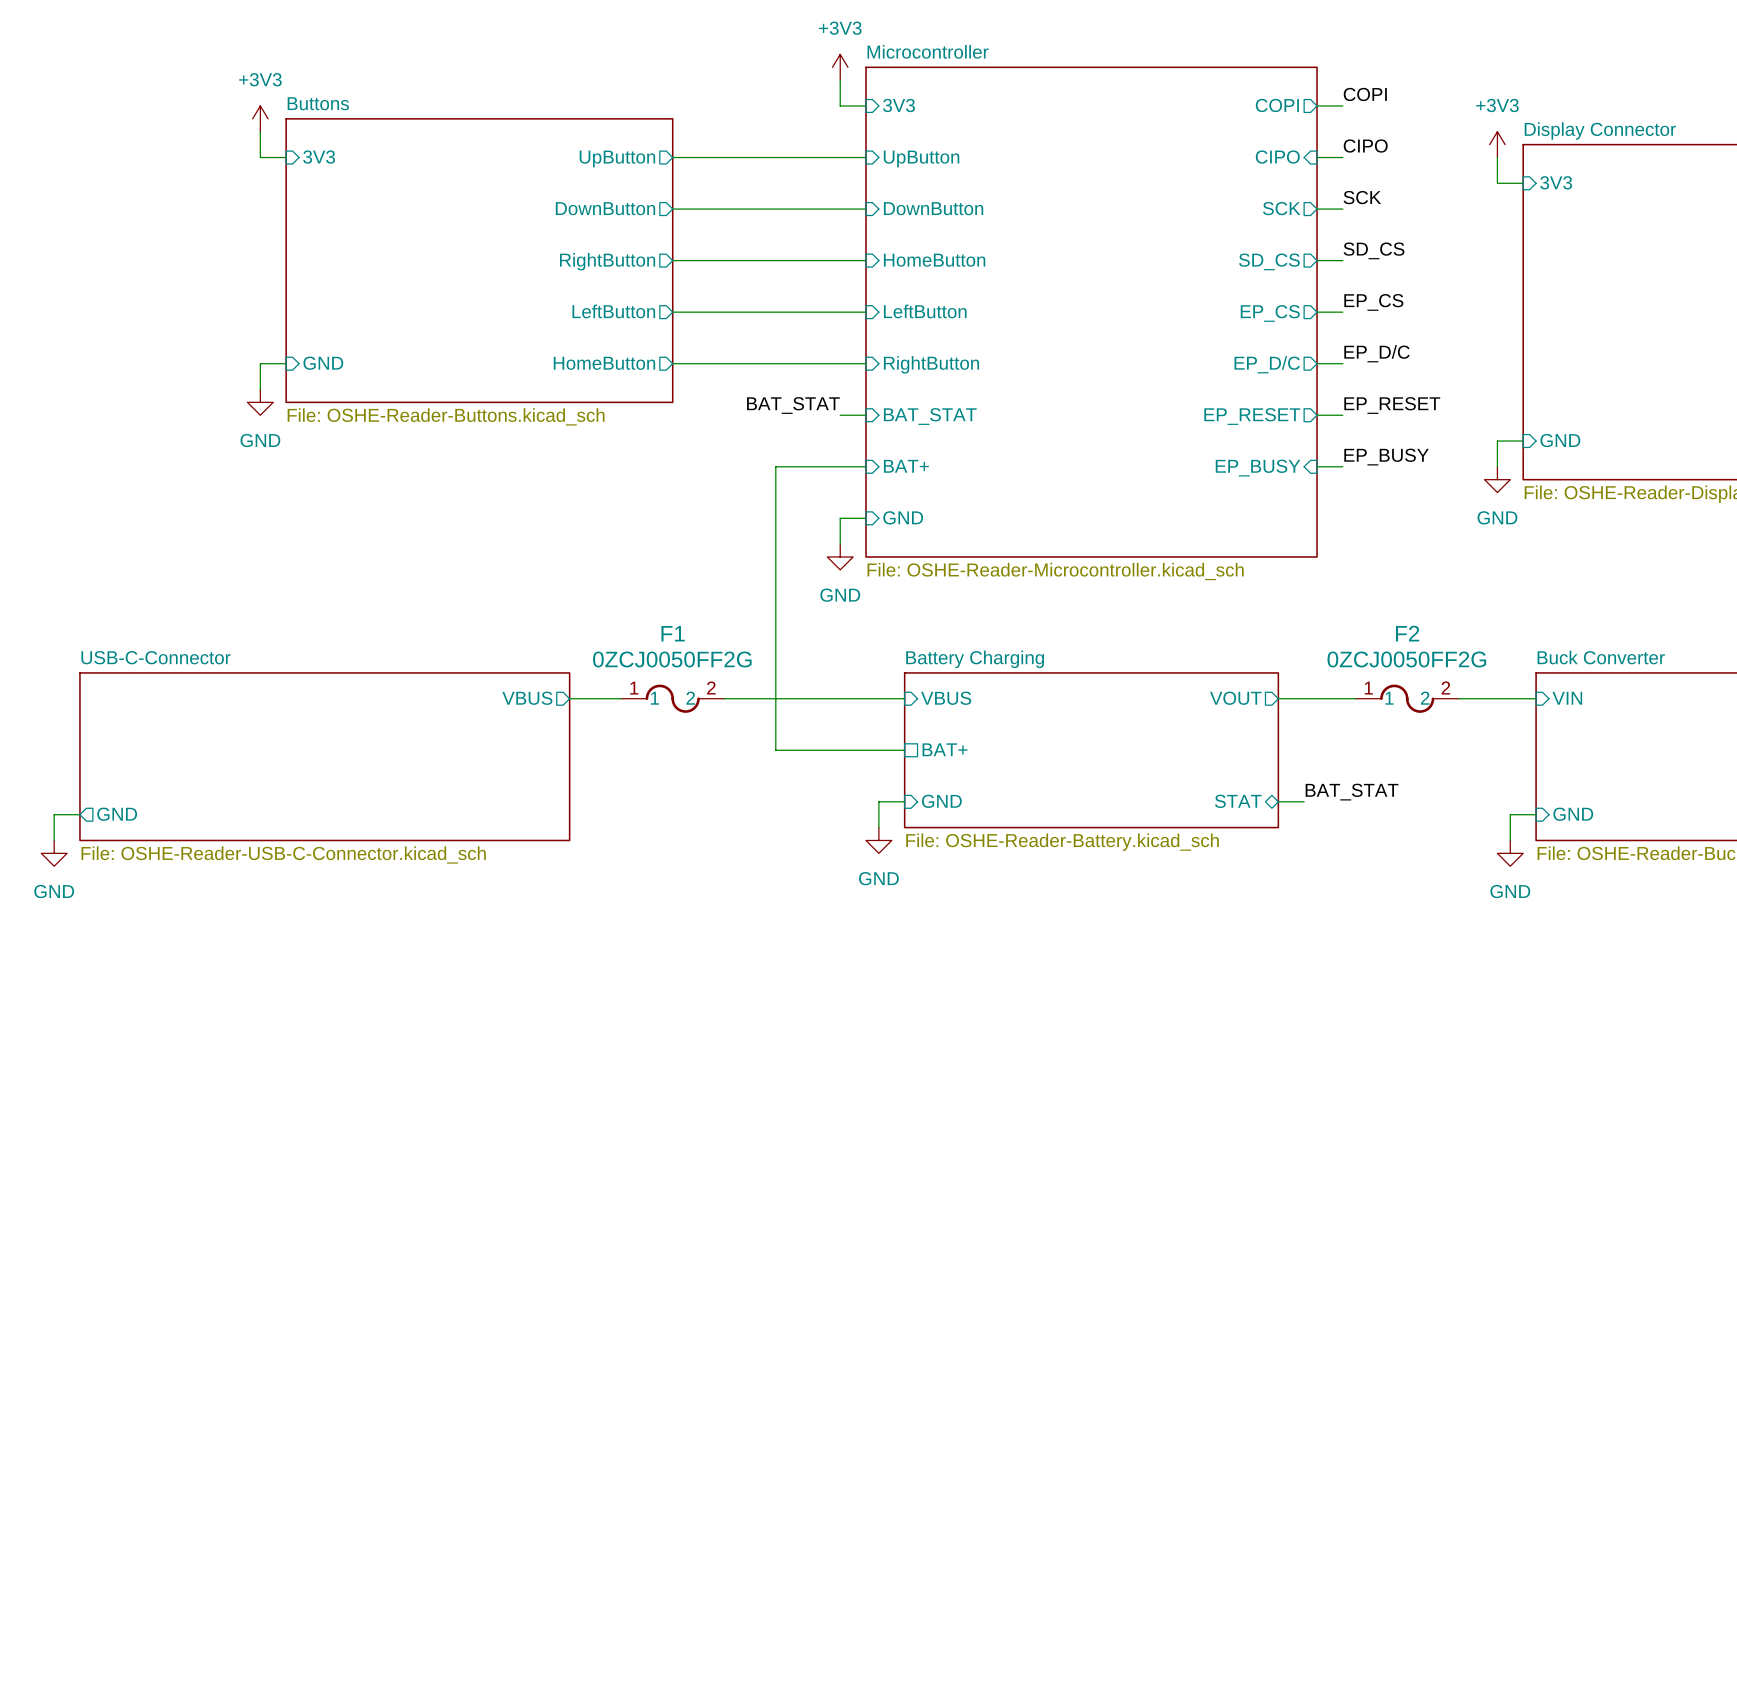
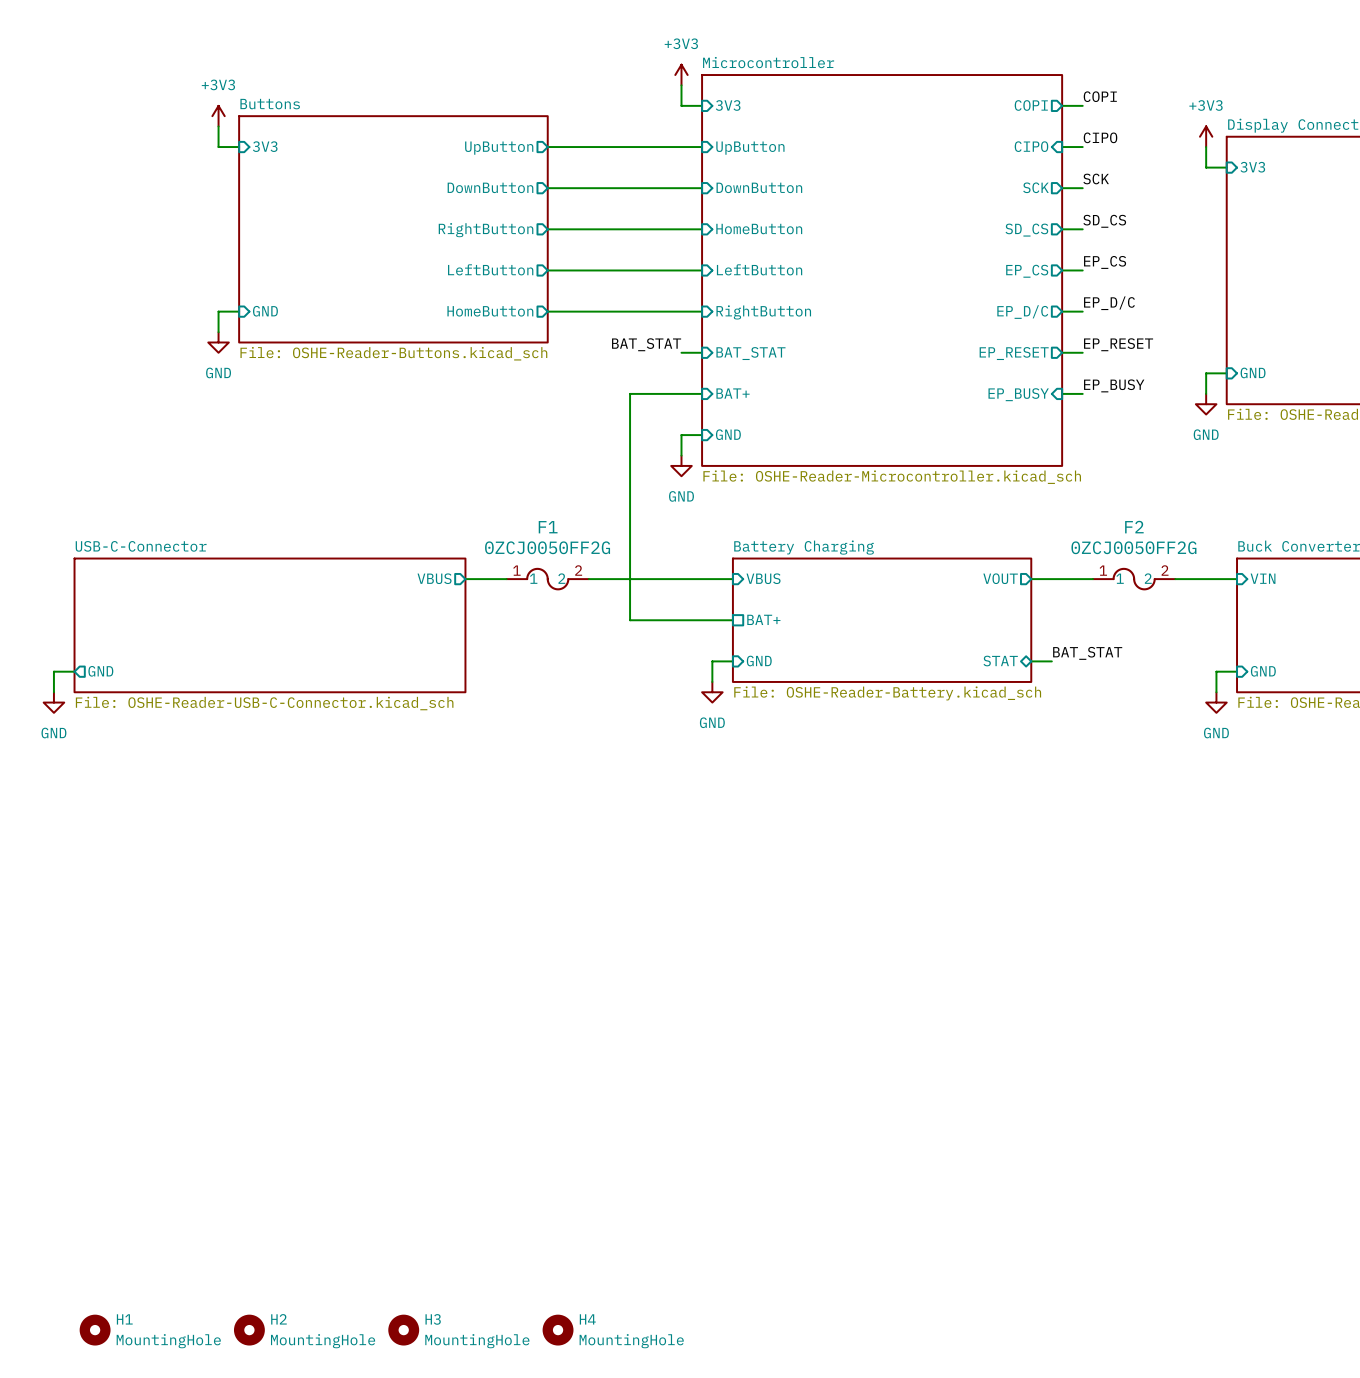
H1: none -> MountingHole (95, 1330)
H2: none -> MountingHole (249, 1330)
H3: none -> MountingHole (403, 1330)
H4: none -> MountingHole (558, 1330)

